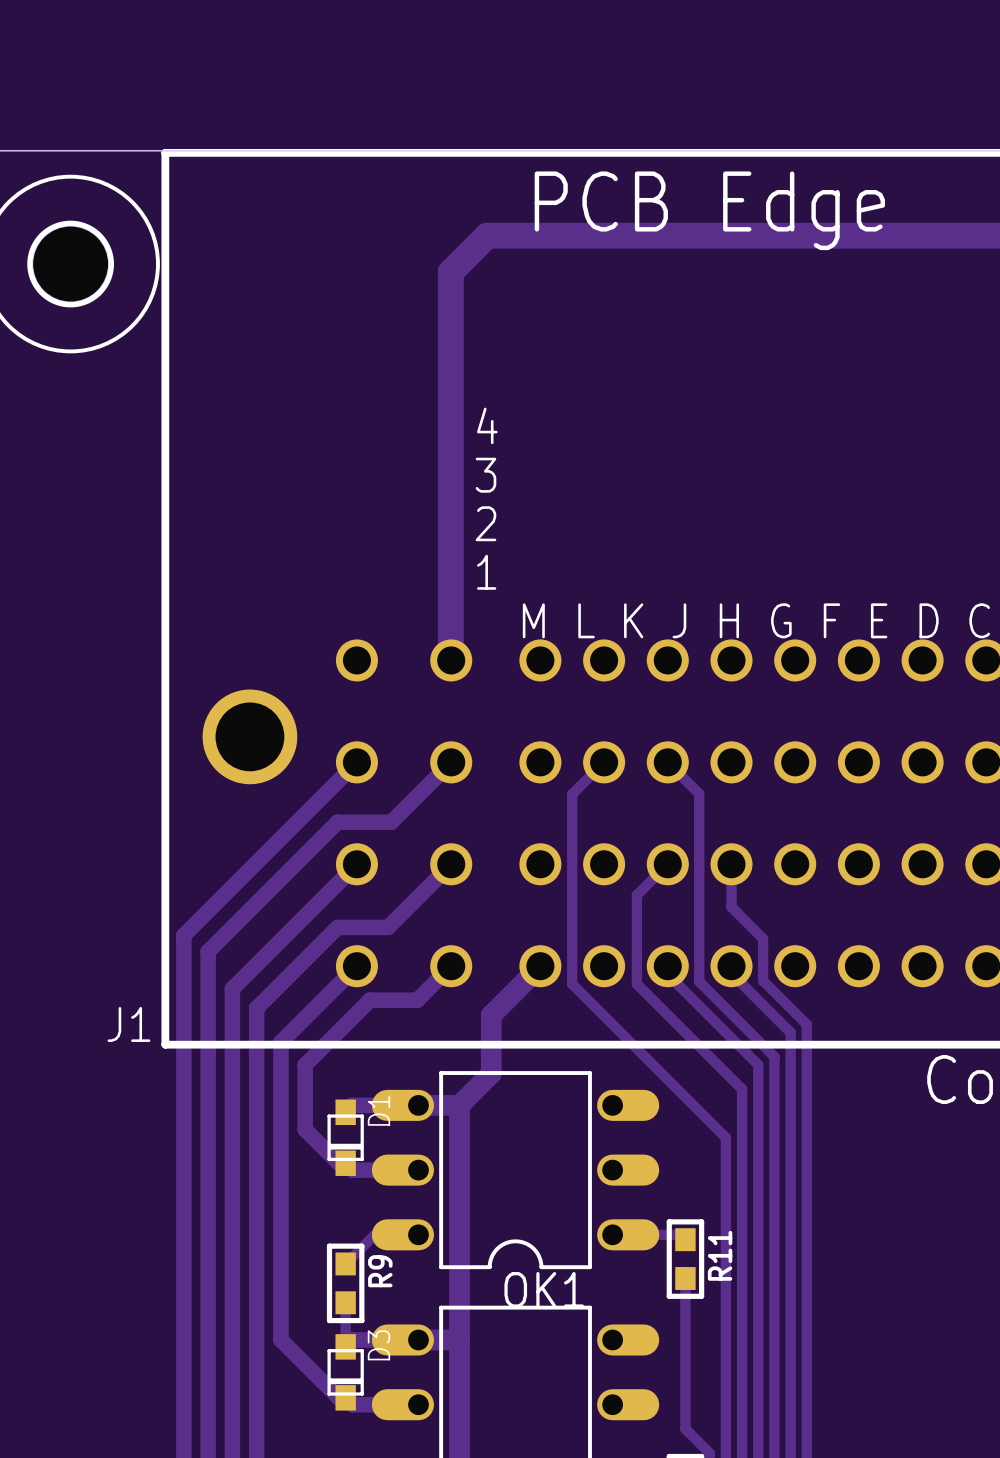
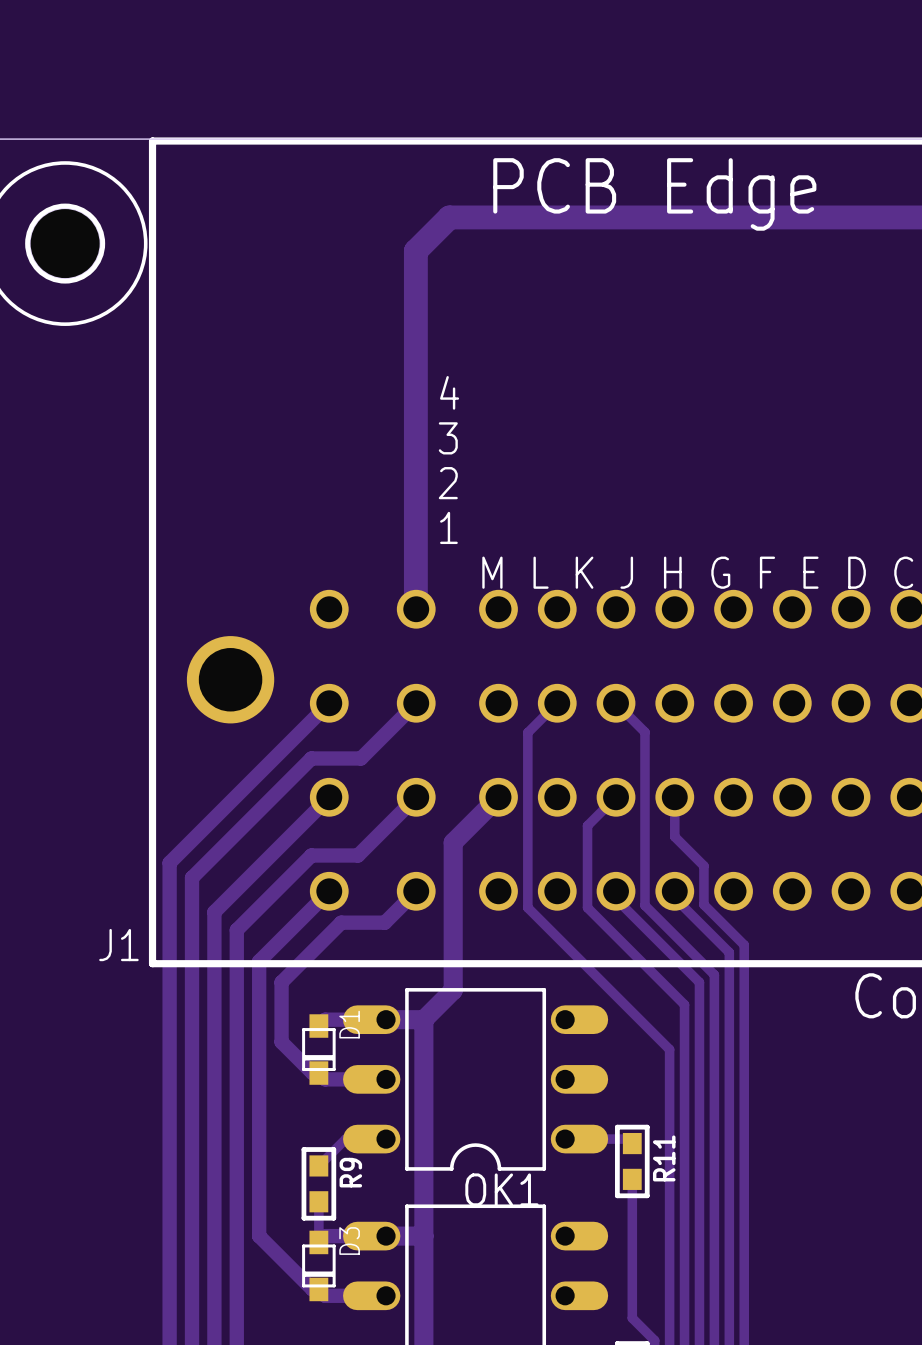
track: (540, 966) (491, 1015) -> (498, 797) (453, 842) (453, 936)

